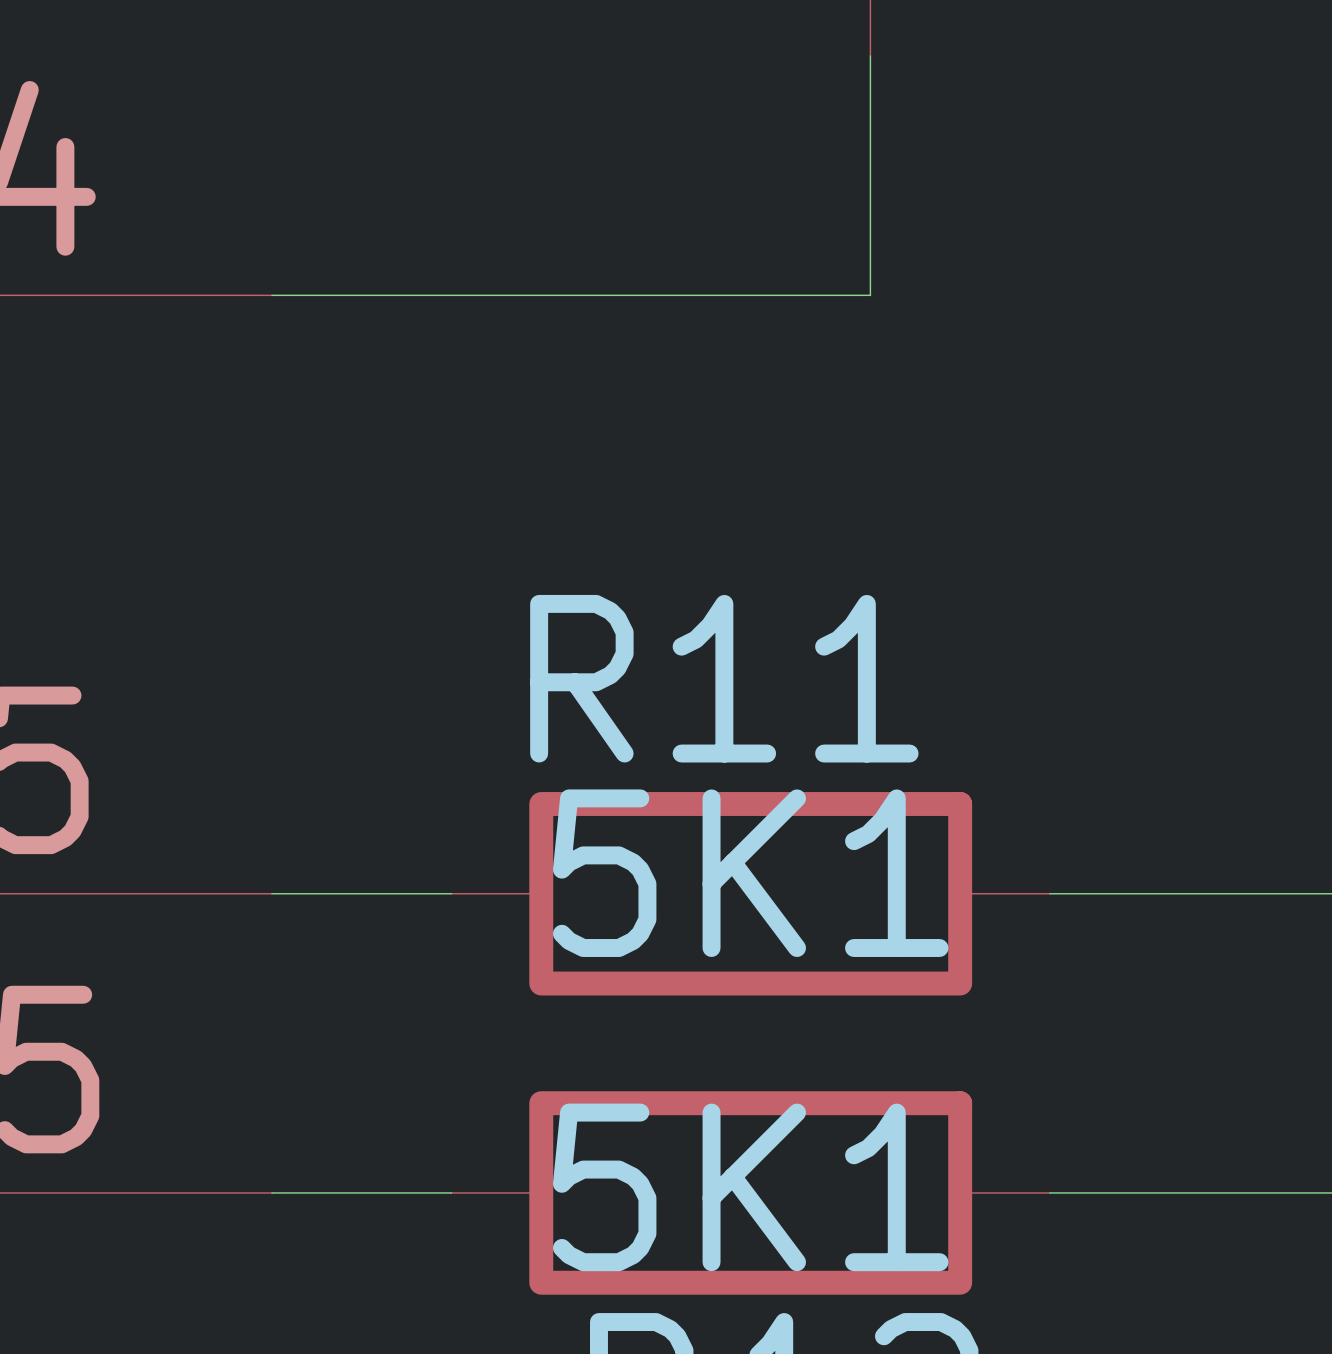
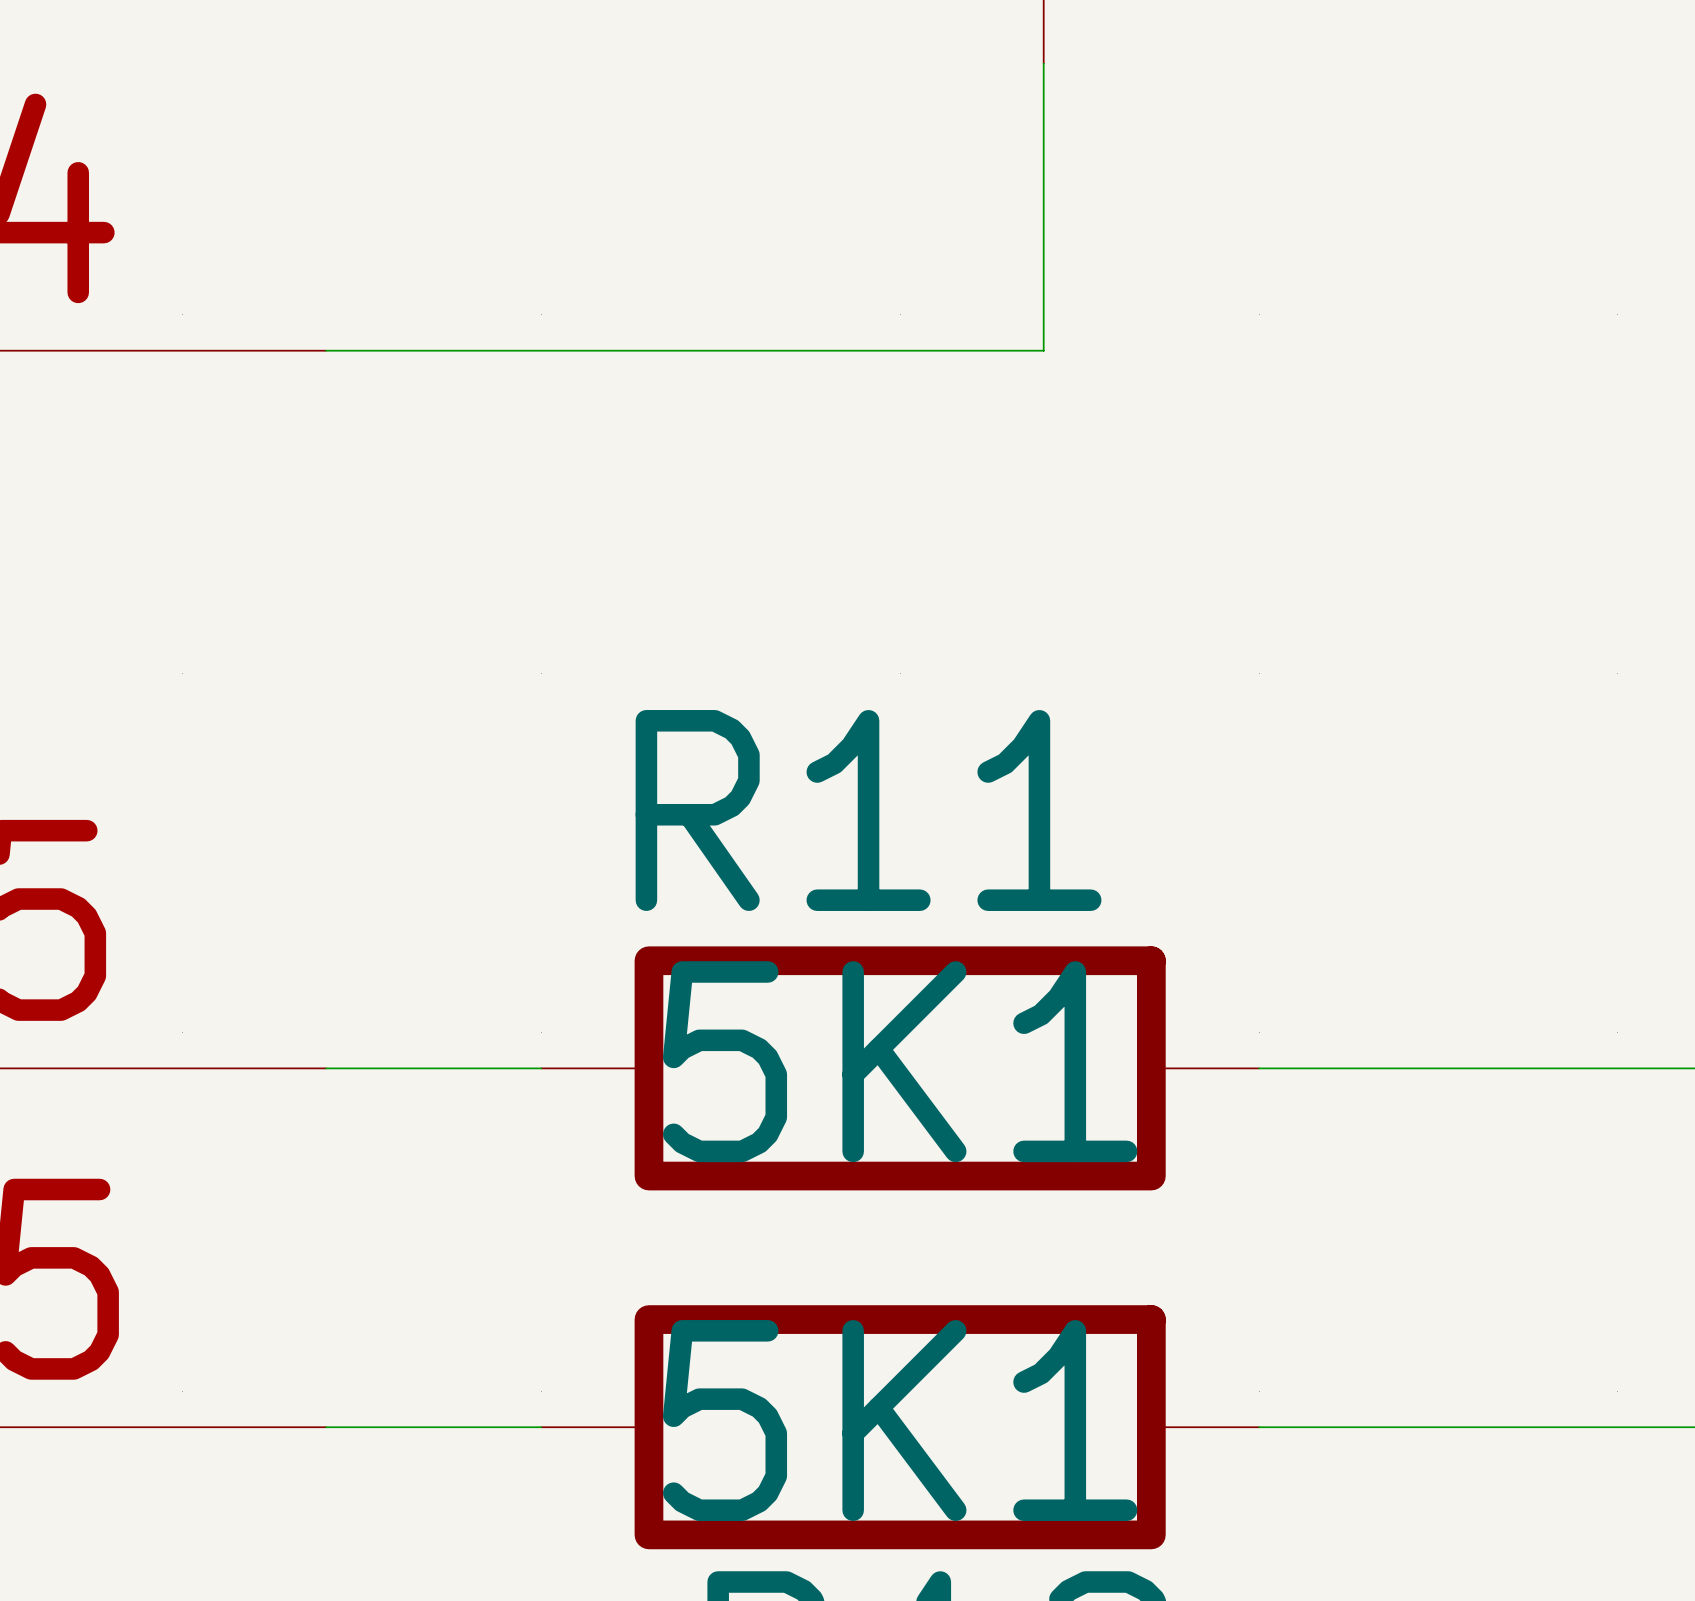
R11 value position: 5K1 (750, 873) -> 5K1 (900, 1061)

